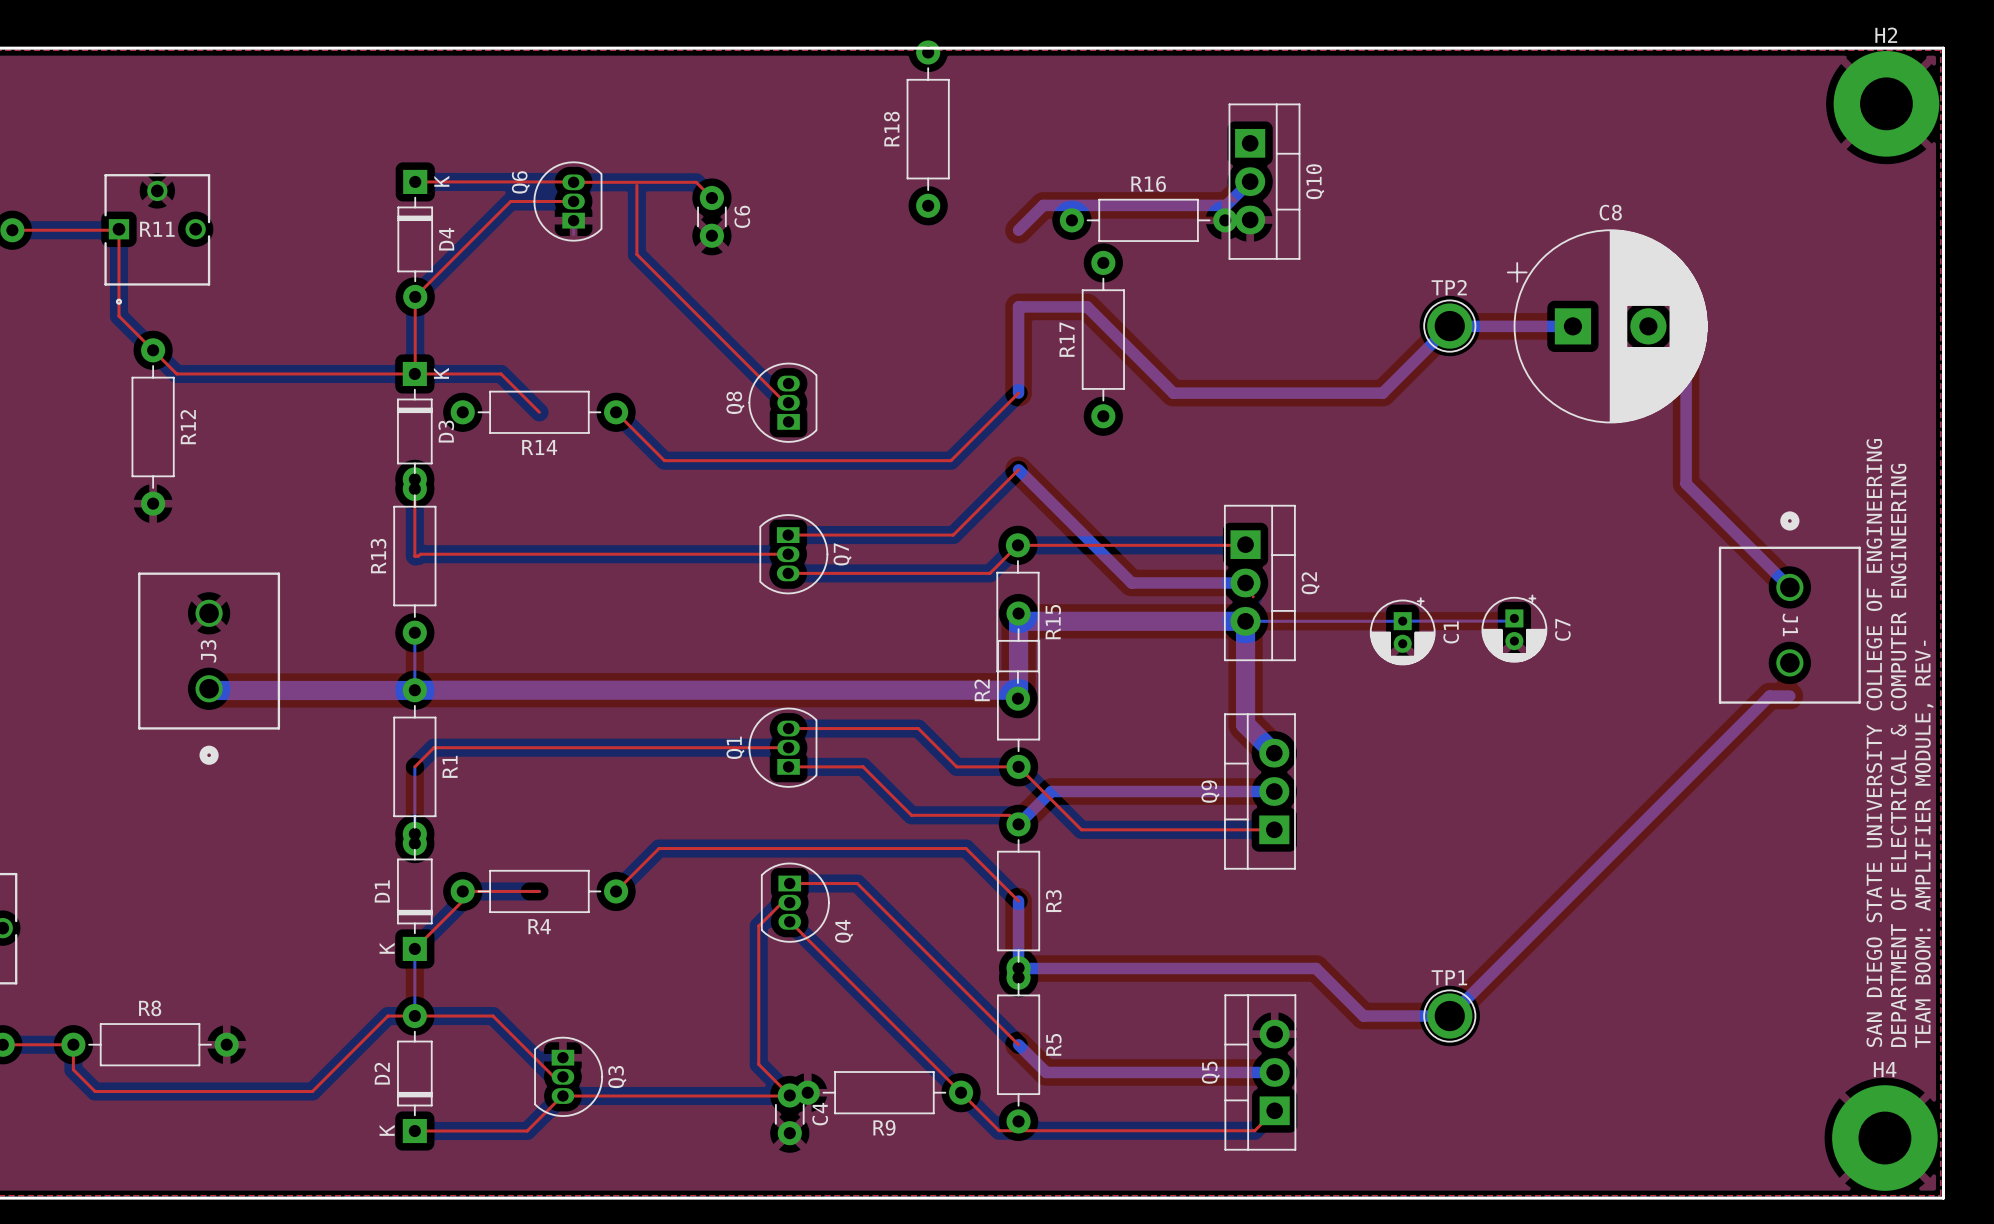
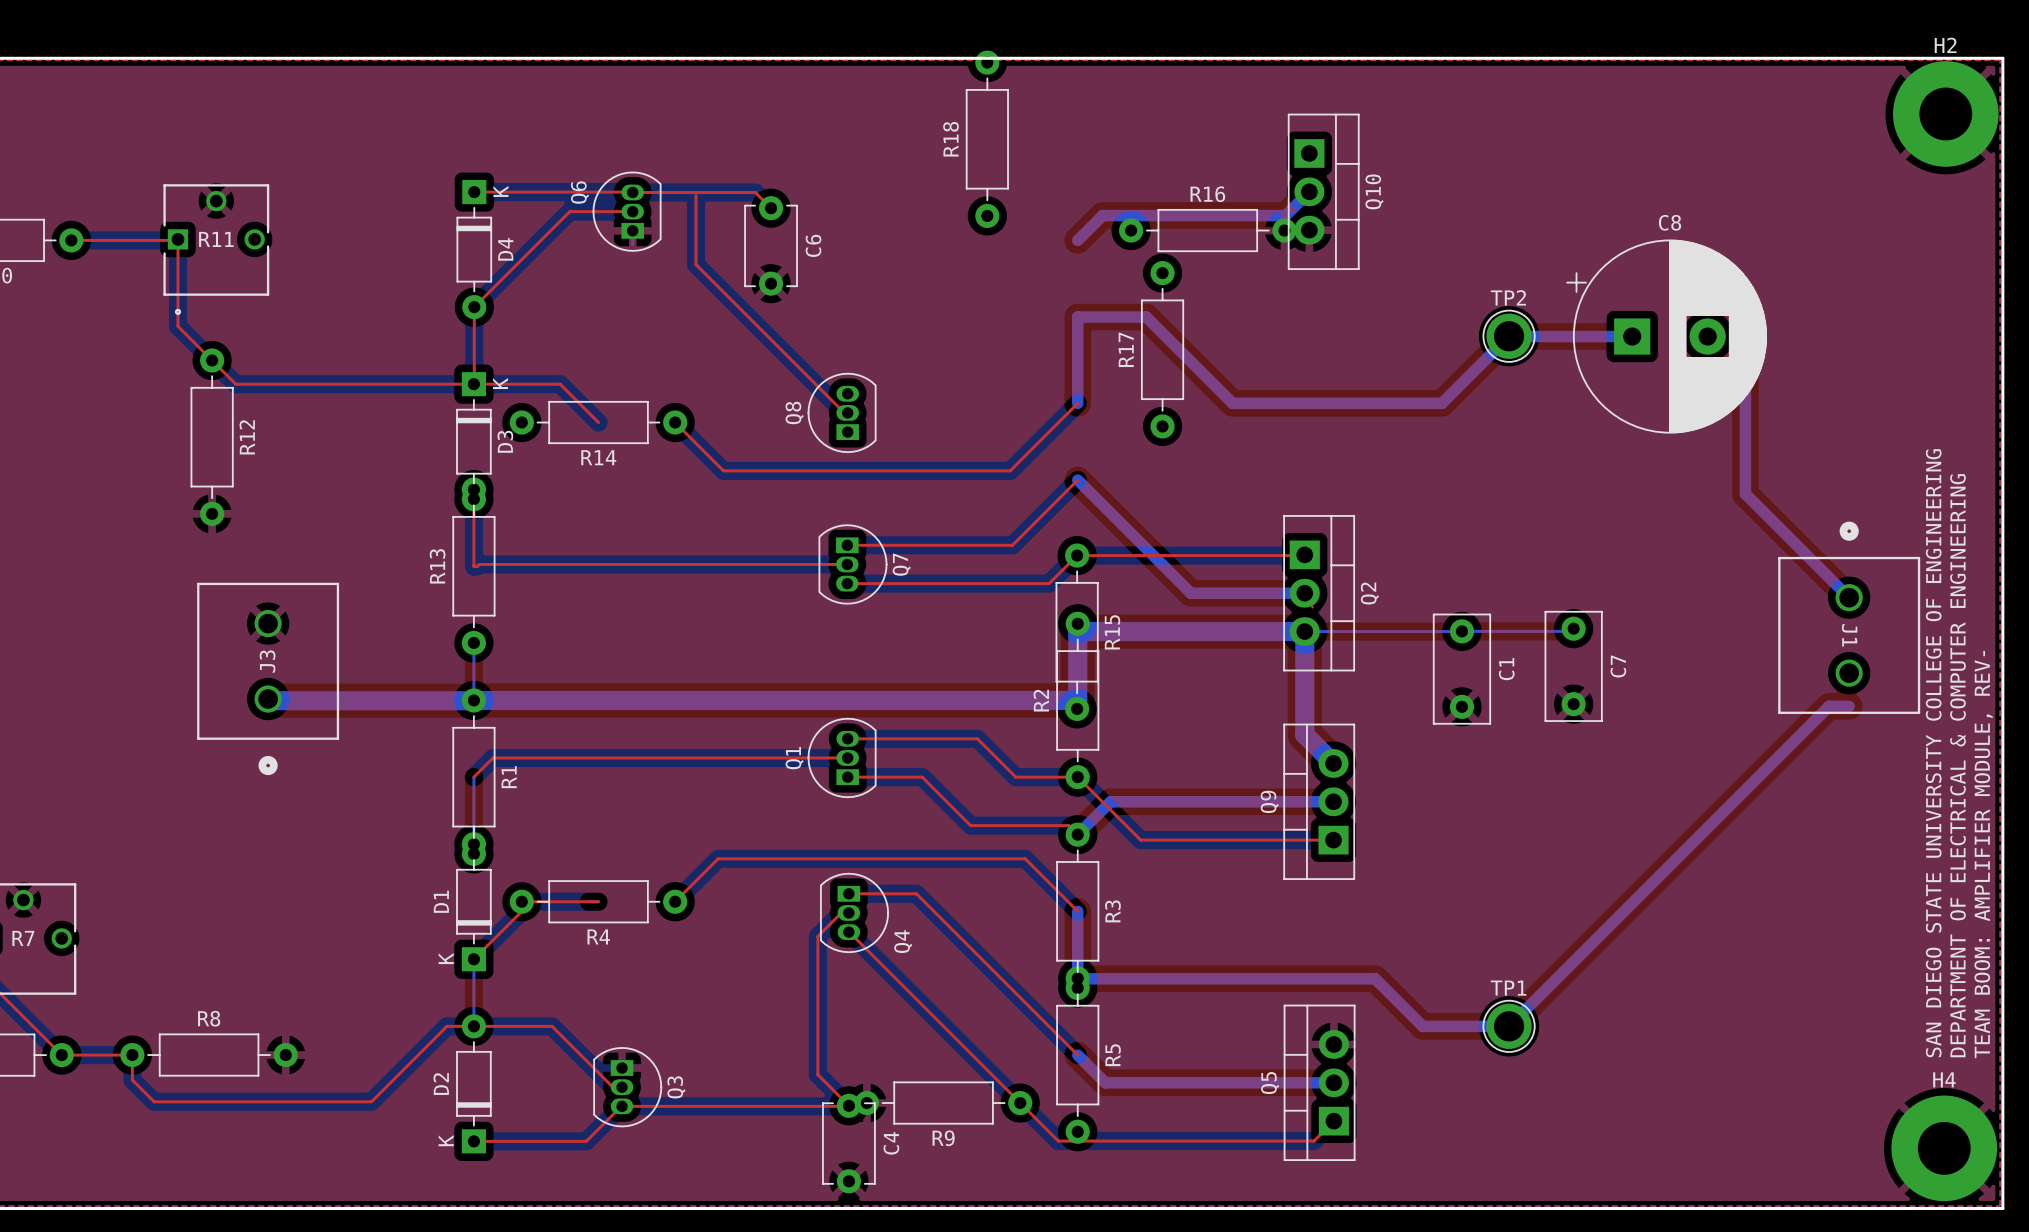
C6 footprint: [697, 185, 727, 248] -> [744, 196, 798, 296]
C7 footprint: [1481, 594, 1548, 663] -> [1544, 610, 1603, 722]
C1 footprint: [1369, 597, 1436, 666] -> [1432, 613, 1492, 725]
C4 footprint: [775, 1083, 805, 1146] -> [822, 1093, 876, 1194]

